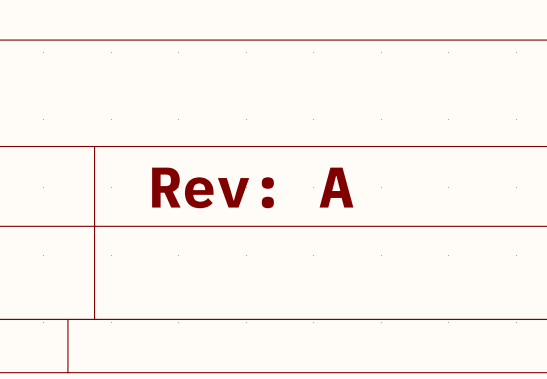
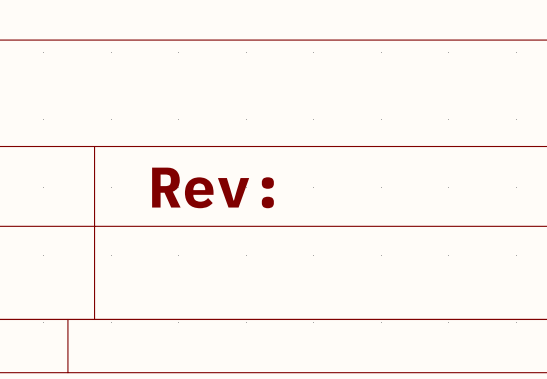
title block: Rev: A (252, 187) -> Rev: (212, 187)

